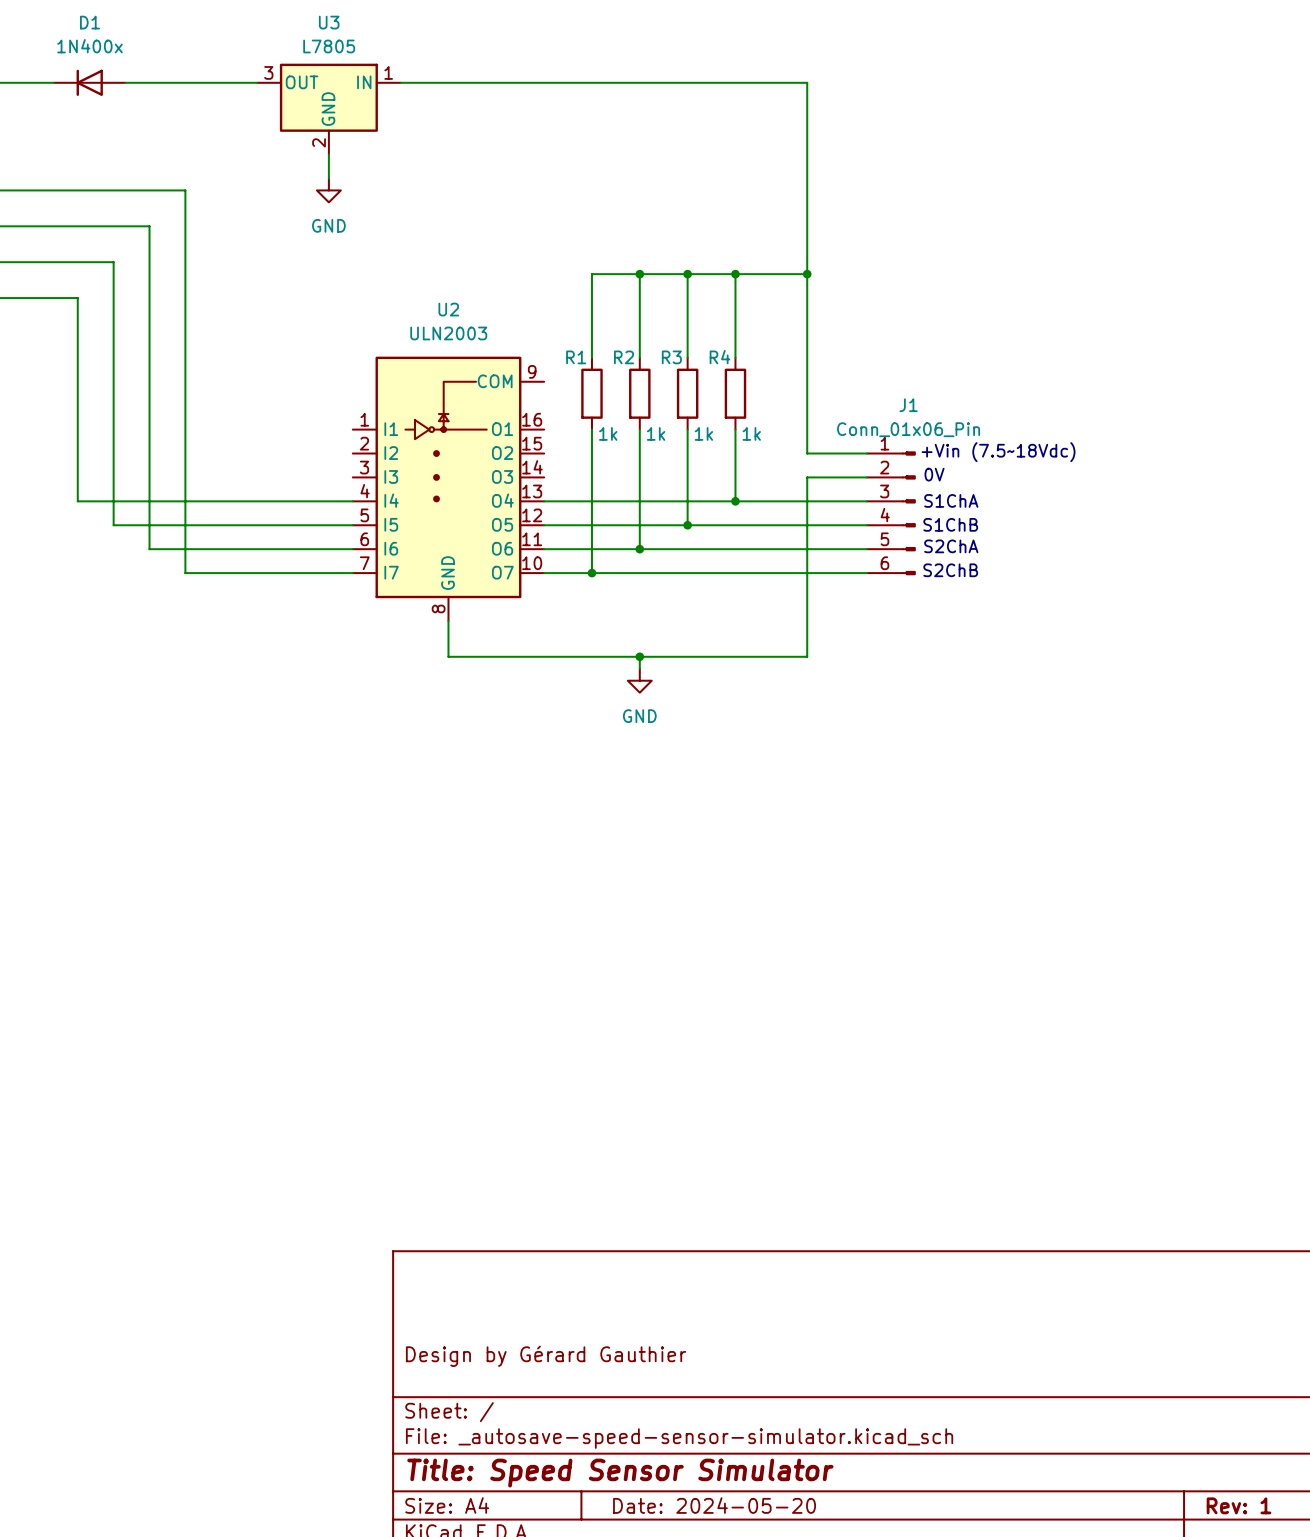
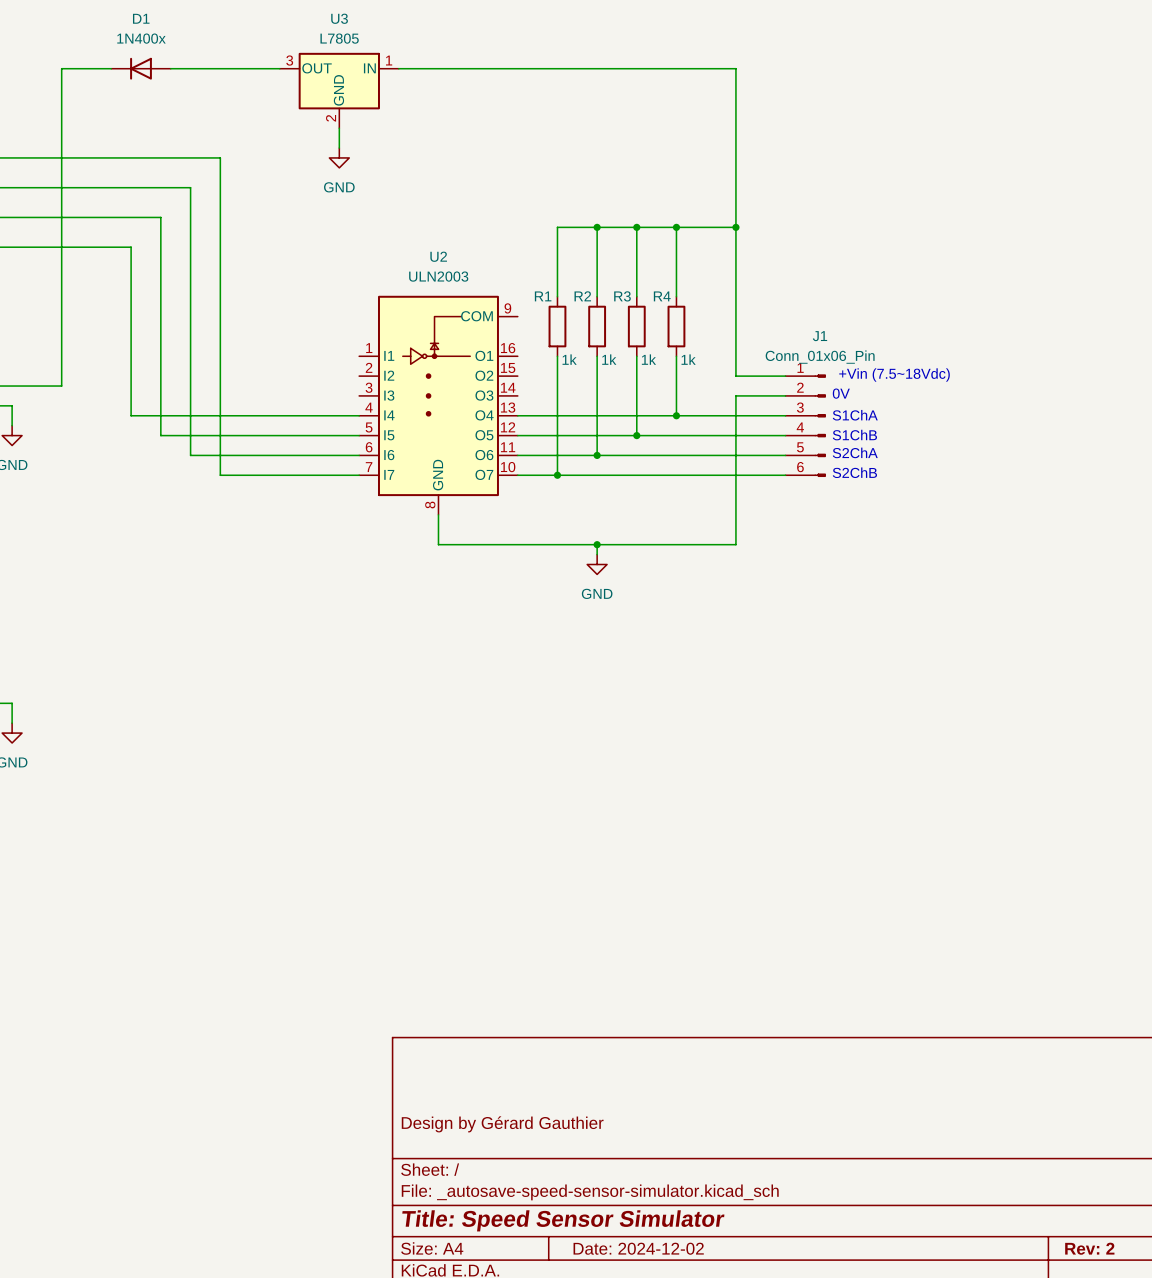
title block: Date: 2024-05-20 (714, 1505) -> Date: 2024-12-02 (638, 1248)
title block: Rev: 1 (1239, 1505) -> Rev: 2 (1089, 1248)

